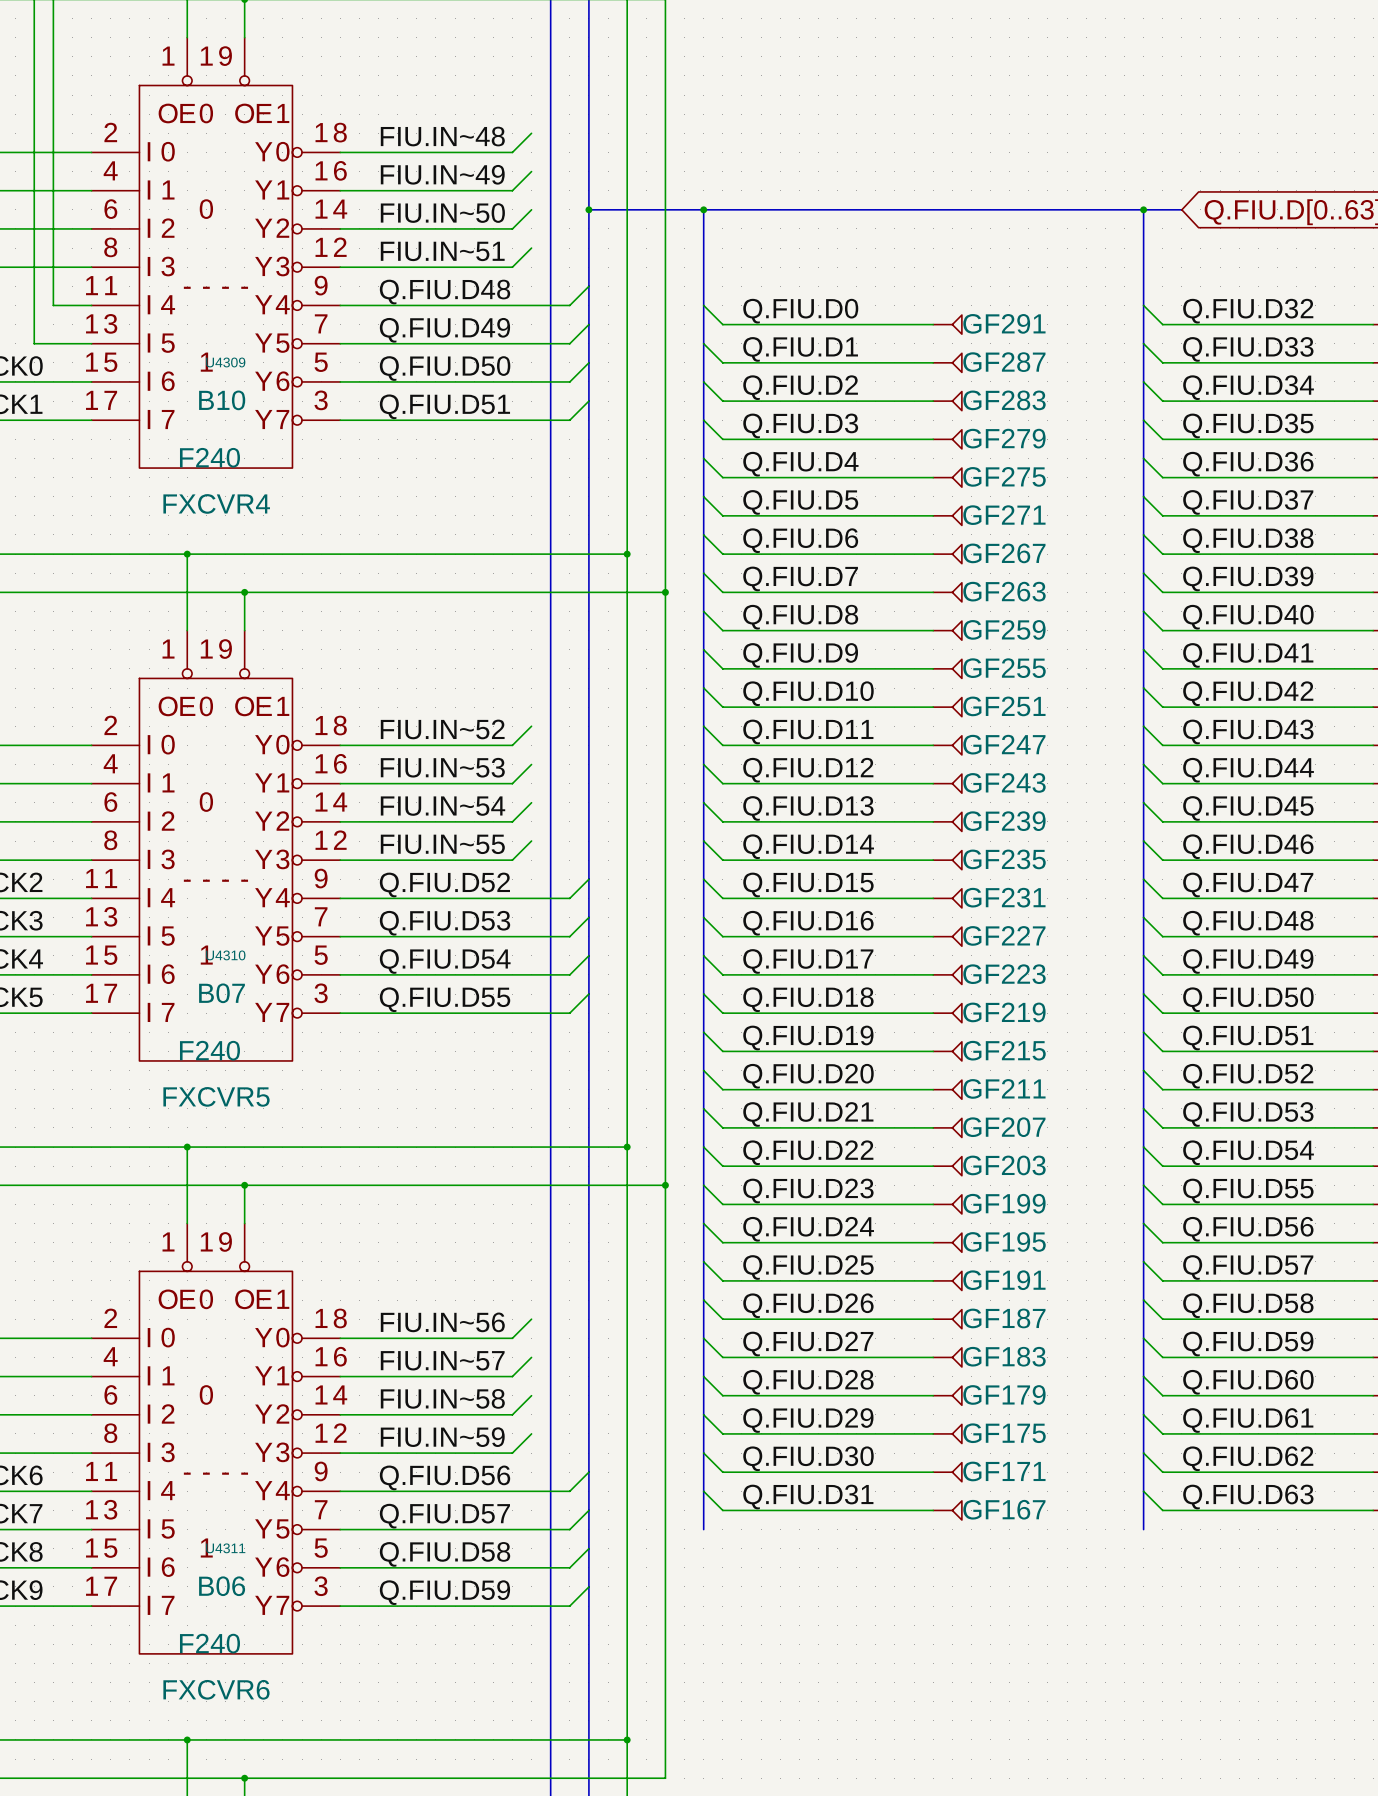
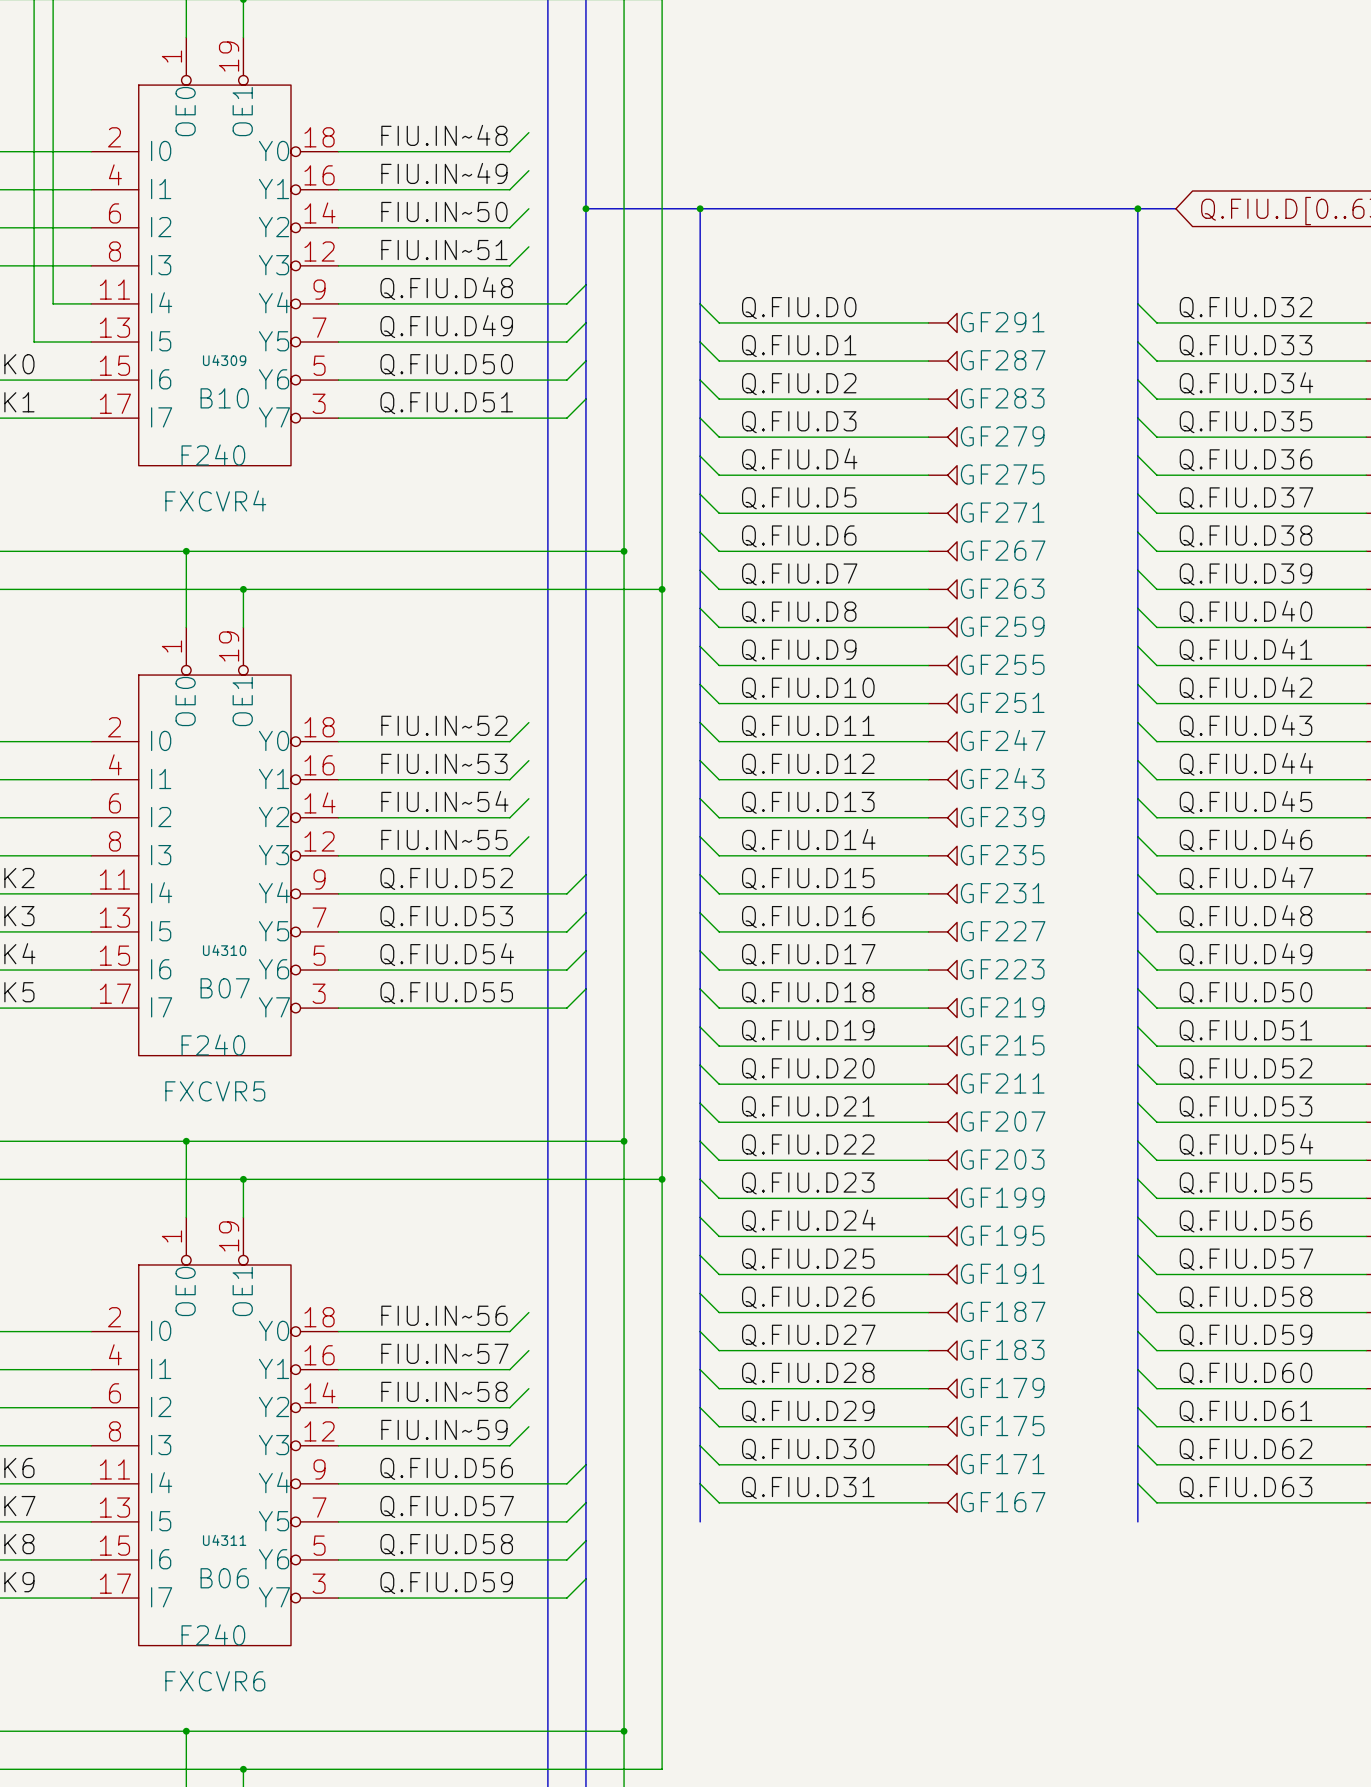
U4309 symbol: [91, 37, 341, 469] -> [91, 37, 339, 466]
U4310 symbol: [91, 630, 341, 1061] -> [91, 627, 339, 1056]
U4311 symbol: [91, 1223, 341, 1654] -> [91, 1217, 339, 1646]

